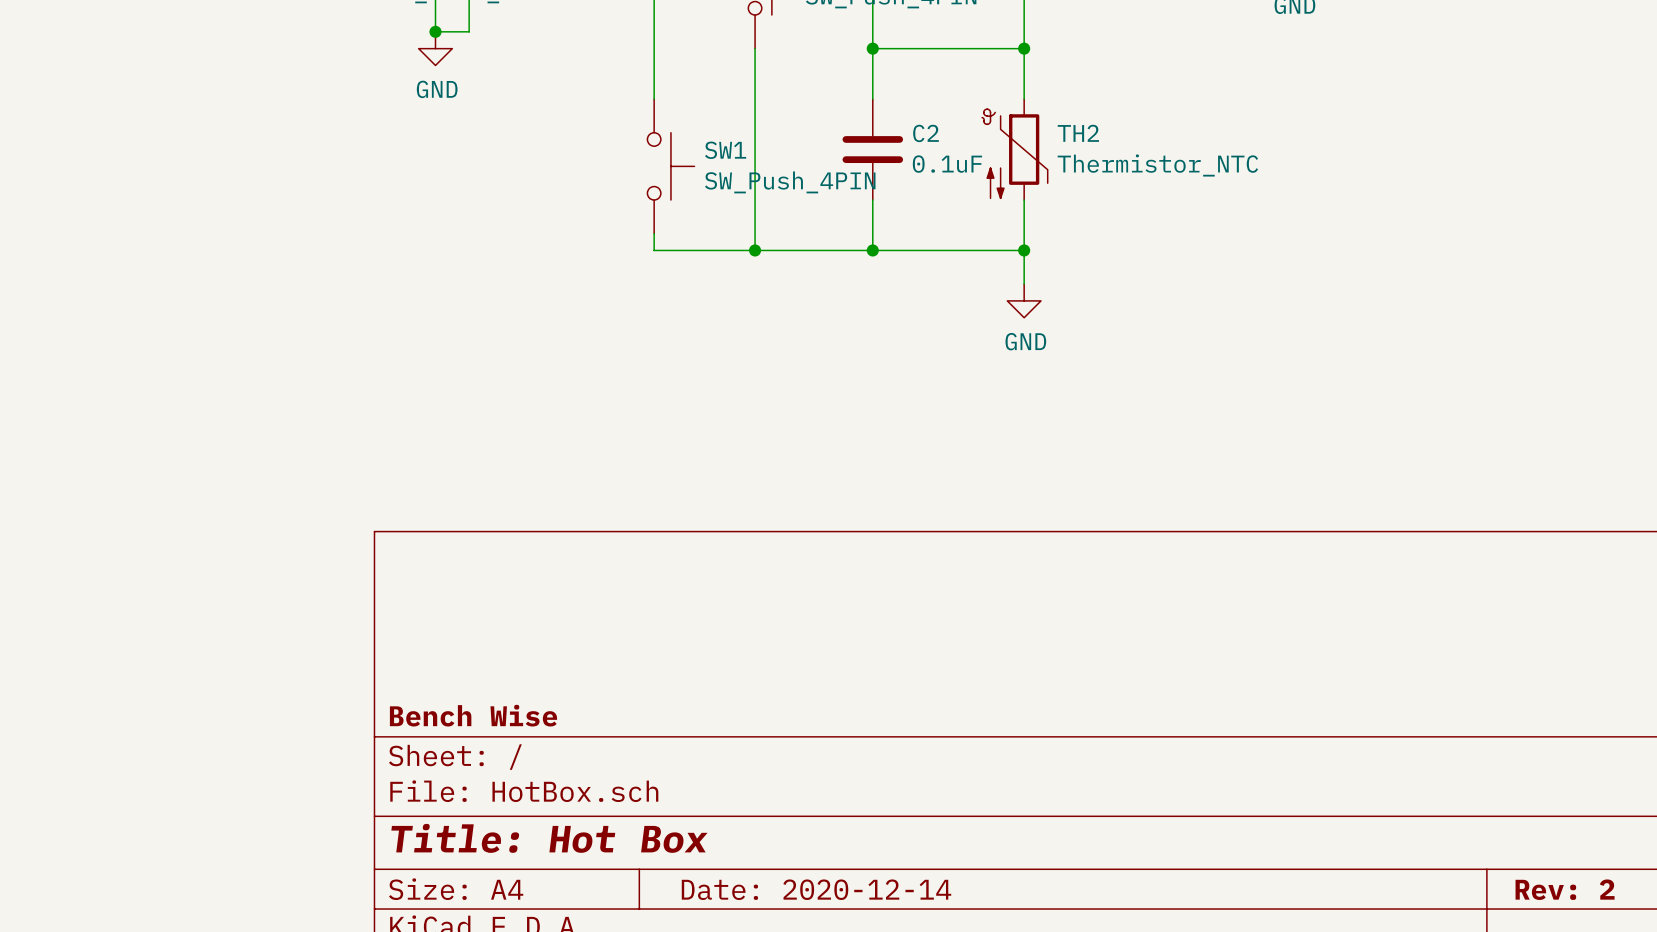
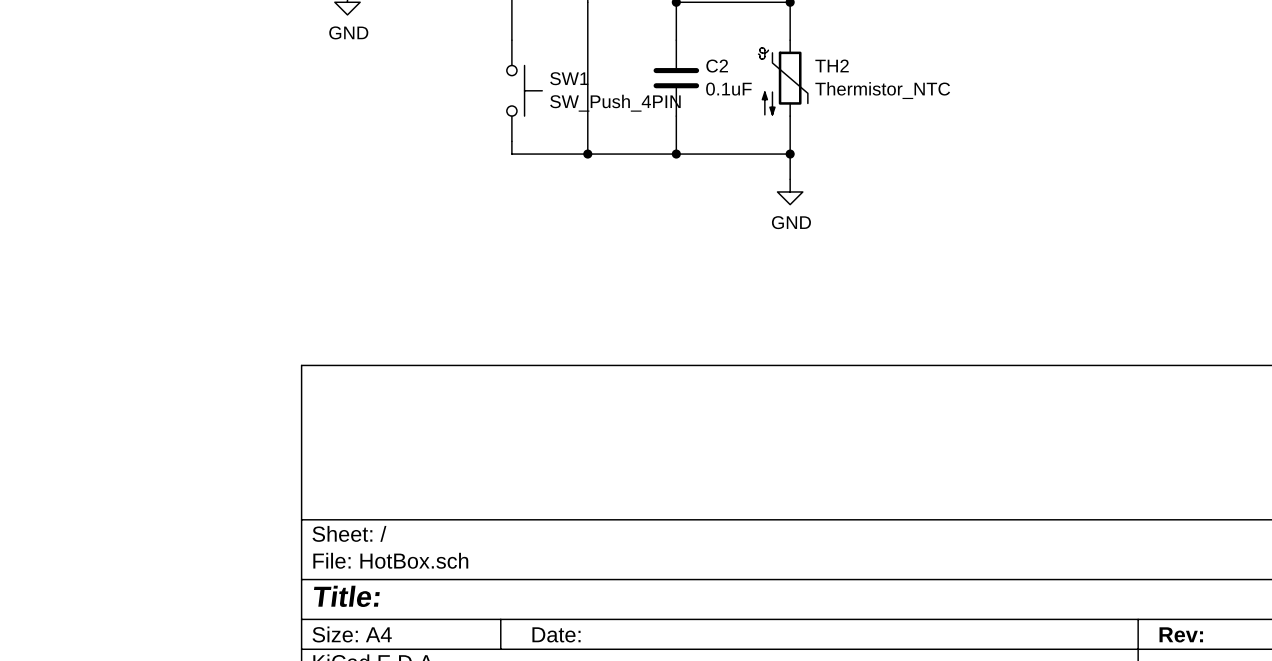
title block: Bench Wise (473, 715) -> none
title block: Title: Hot Box (549, 838) -> Title: (346, 596)
title block: Date: 2020-12-14 (816, 889) -> Date: (556, 634)
title block: Rev: 2 (1565, 889) -> Rev: (1181, 634)

